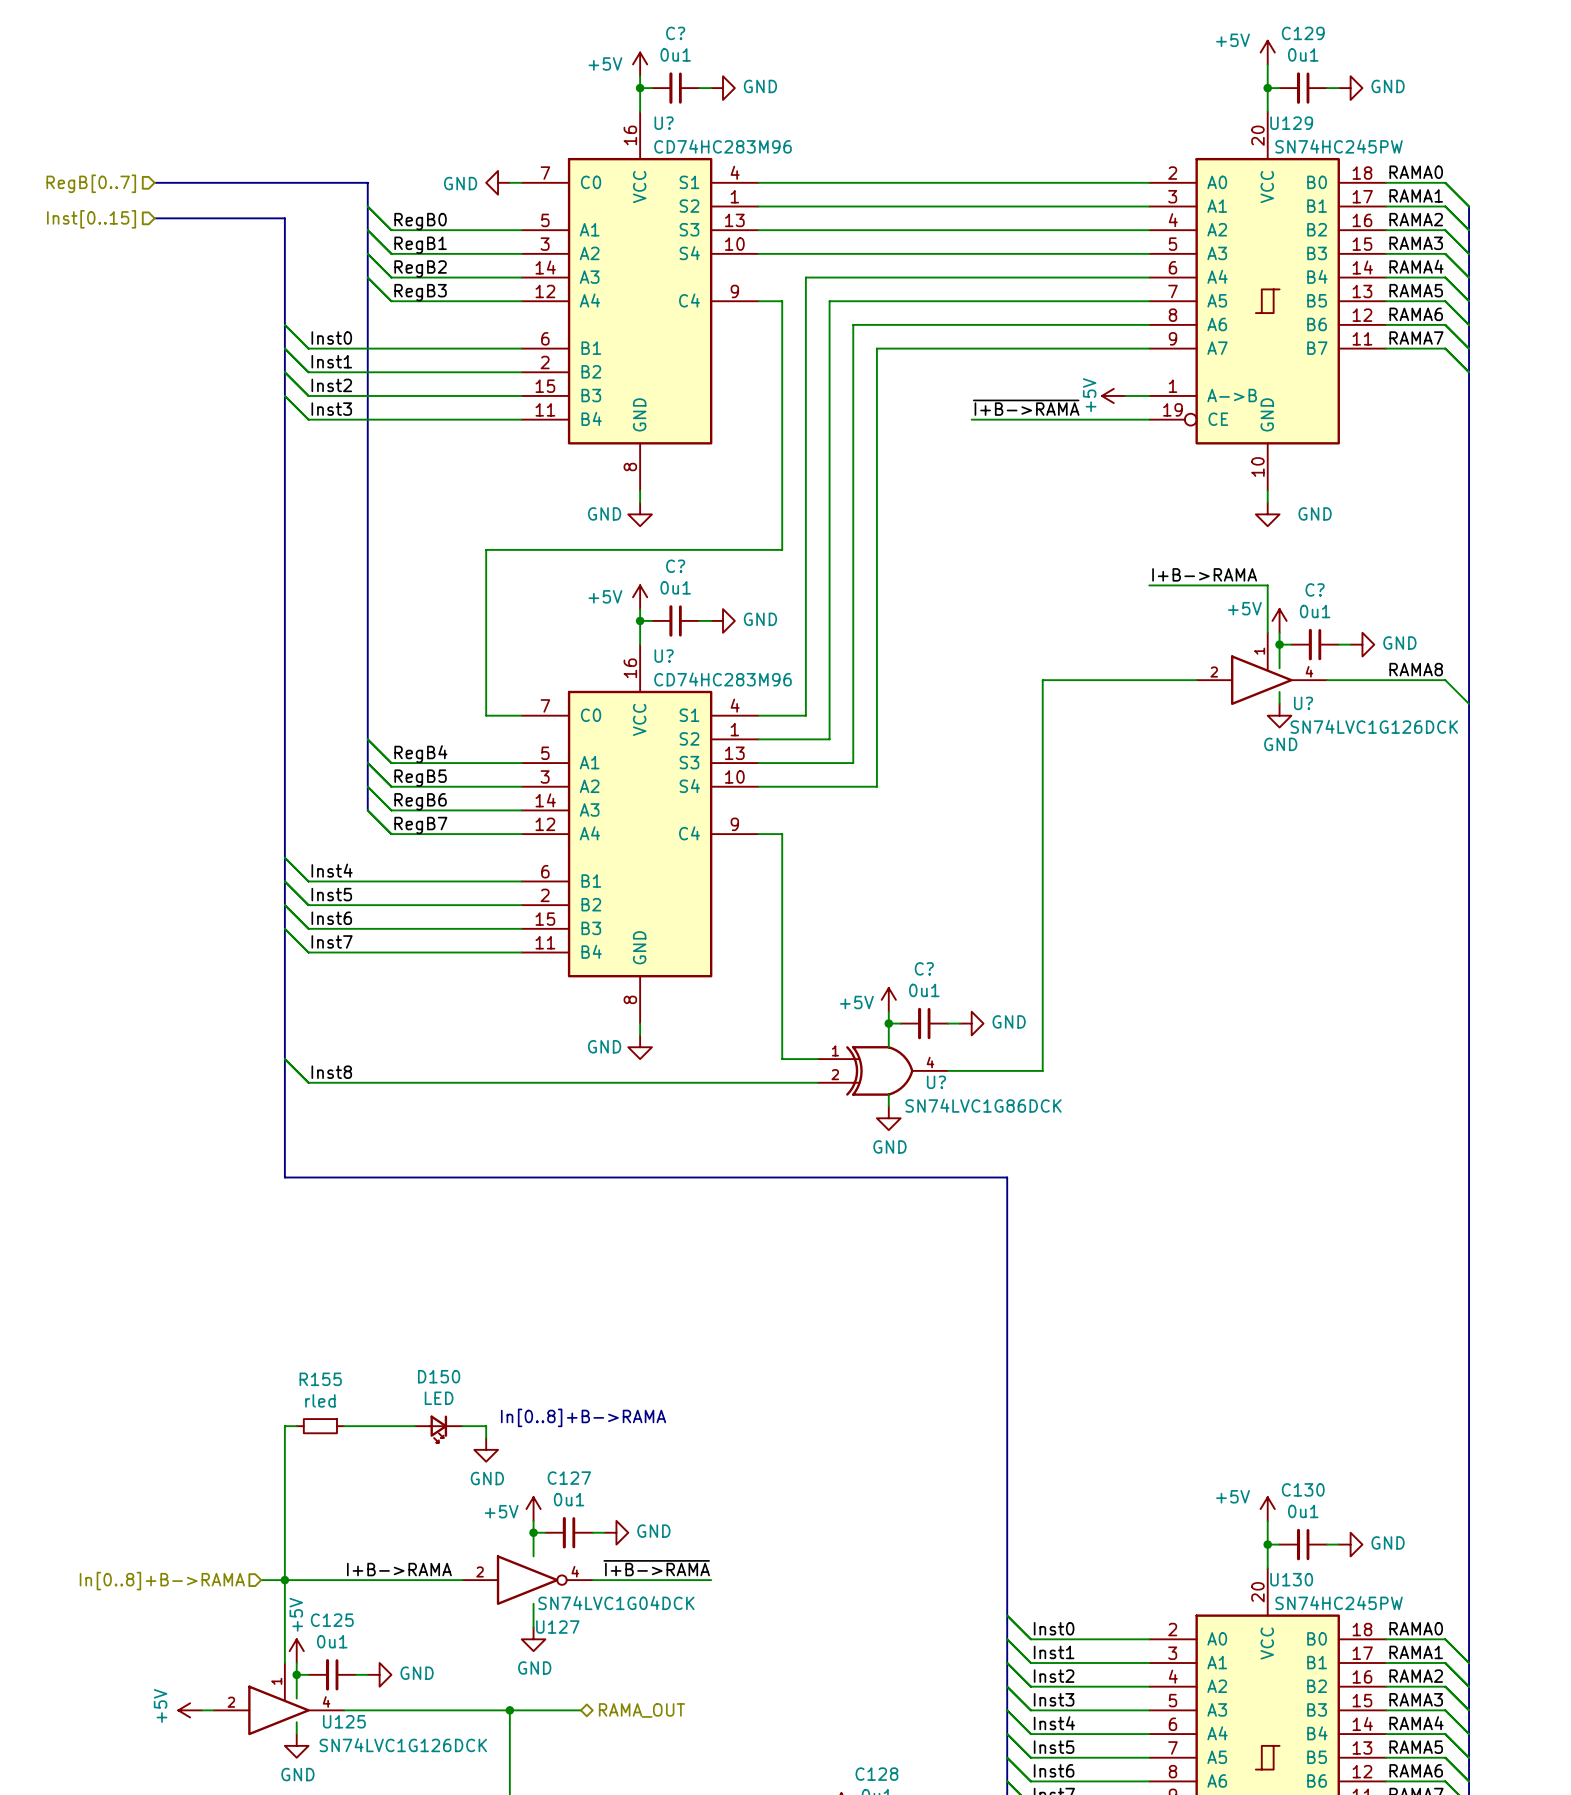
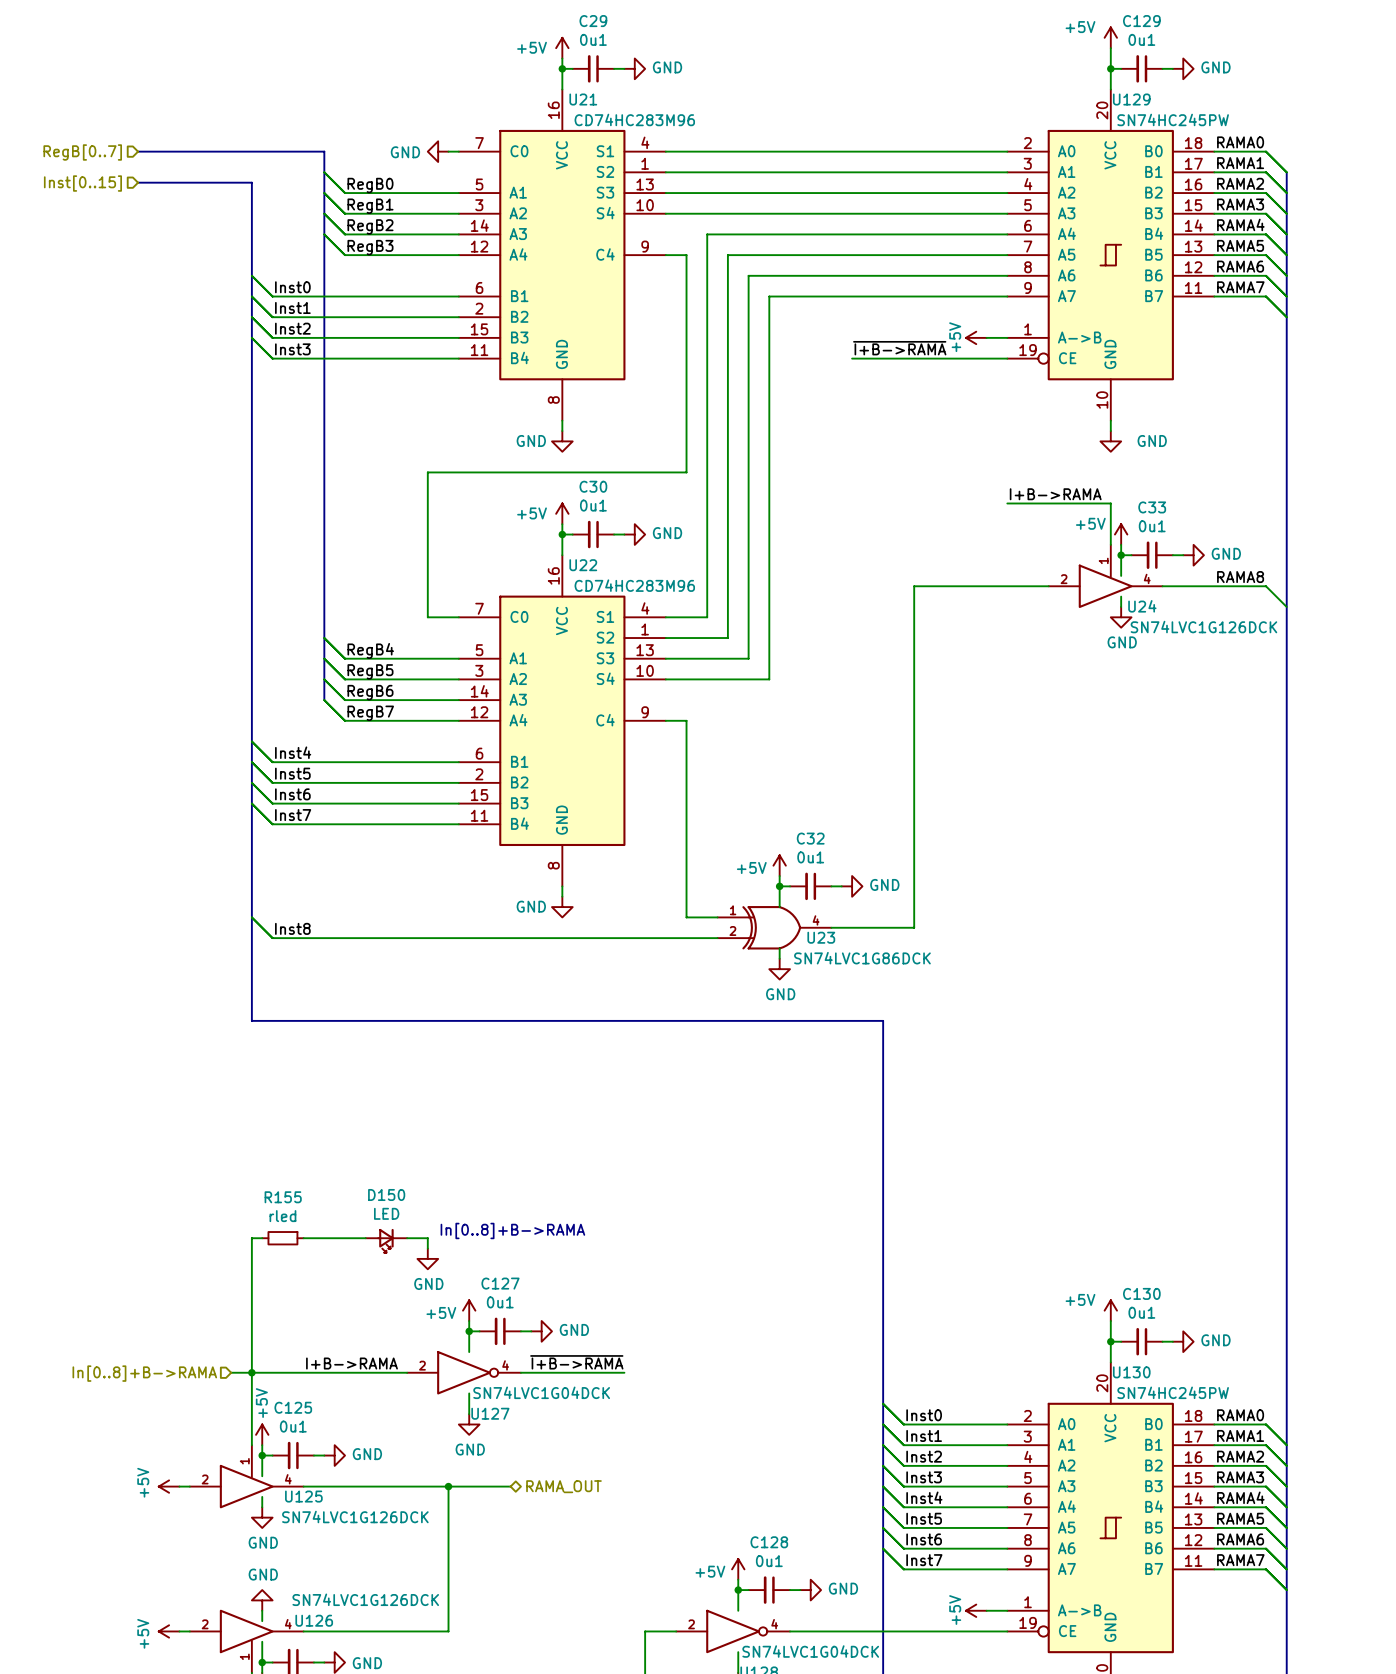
C? name: C? (675, 33) -> C29 (593, 21)
U? name: U? (664, 123) -> U21 (583, 99)
C? name: C? (675, 566) -> C30 (593, 486)
C? name: C? (1315, 589) -> C33 (1152, 507)
U? name: U? (664, 656) -> U22 (583, 565)
U? name: U? (1303, 703) -> U24 (1142, 606)
C? name: C? (924, 968) -> C32 (810, 838)
U? name: U? (936, 1082) -> U23 (821, 937)

